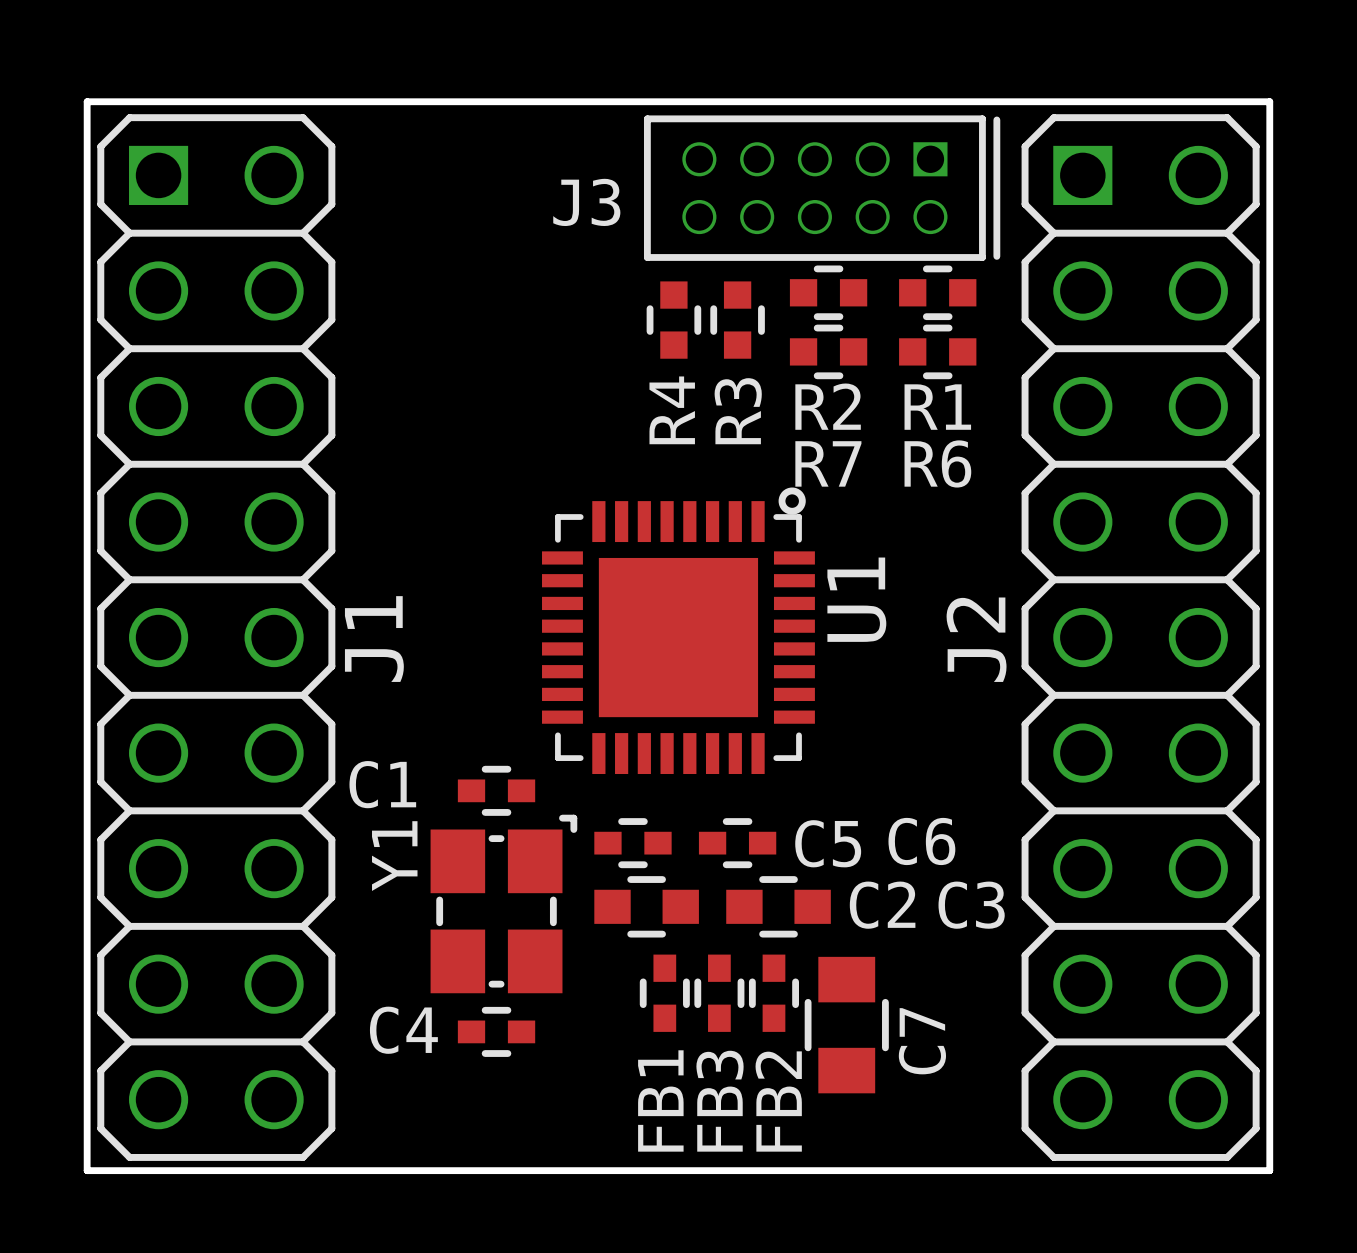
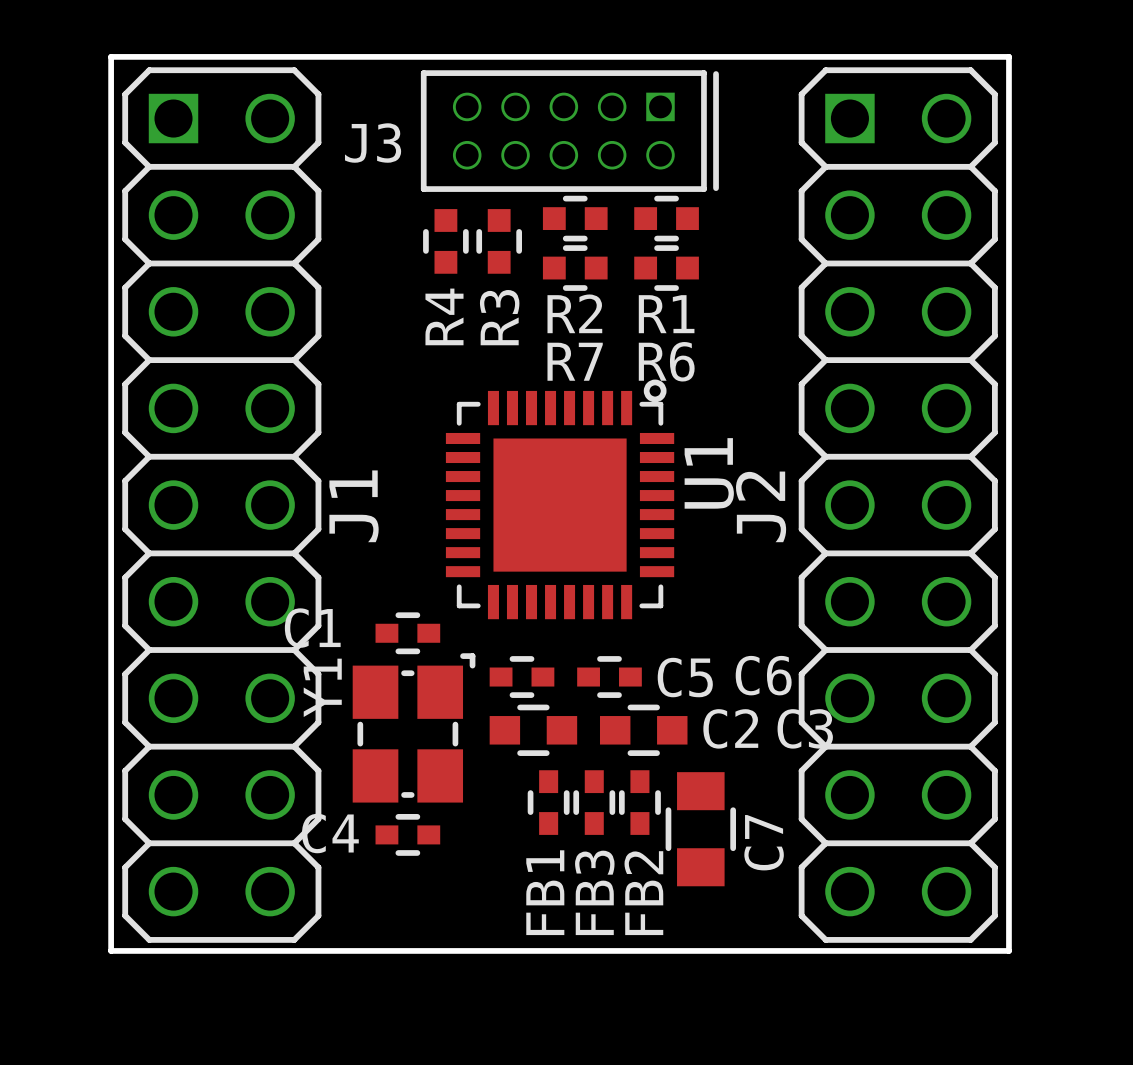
board edge: (141, 101) (87, 101) (87, 1170) (141, 1170) -> (111, 56) (111, 950)
board edge: (1215, 101) (1269, 101) (1269, 1170) (1215, 1170) -> (1008, 56) (1008, 950)
J3 position: (822, 188) -> (569, 131)
R2 position: (828, 292) -> (575, 218)
R1 position: (937, 292) -> (666, 218)
R4 position: (673, 320) -> (445, 241)
R3 position: (737, 320) -> (499, 241)
R7 position: (828, 351) -> (575, 268)
R6 position: (937, 351) -> (666, 268)
J1 position: (216, 637) -> (221, 505)
J2 position: (1140, 637) -> (898, 505)

